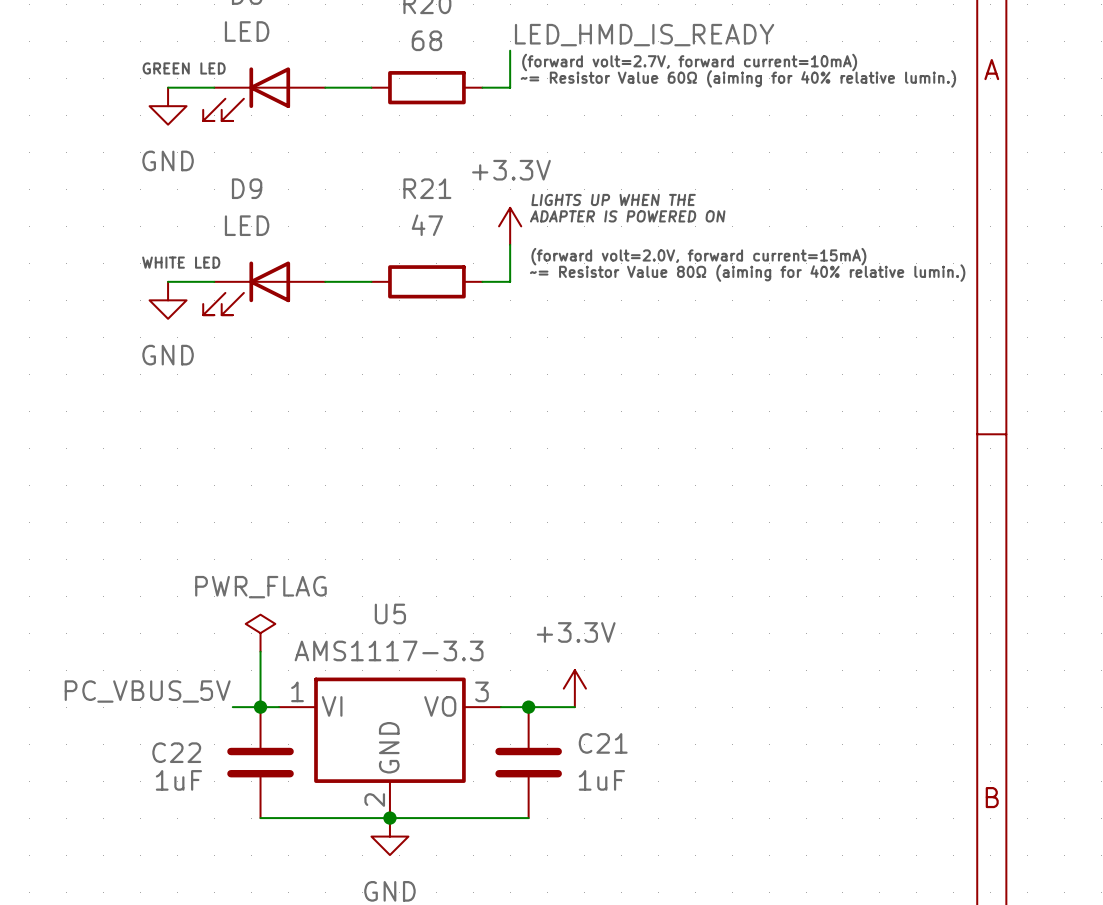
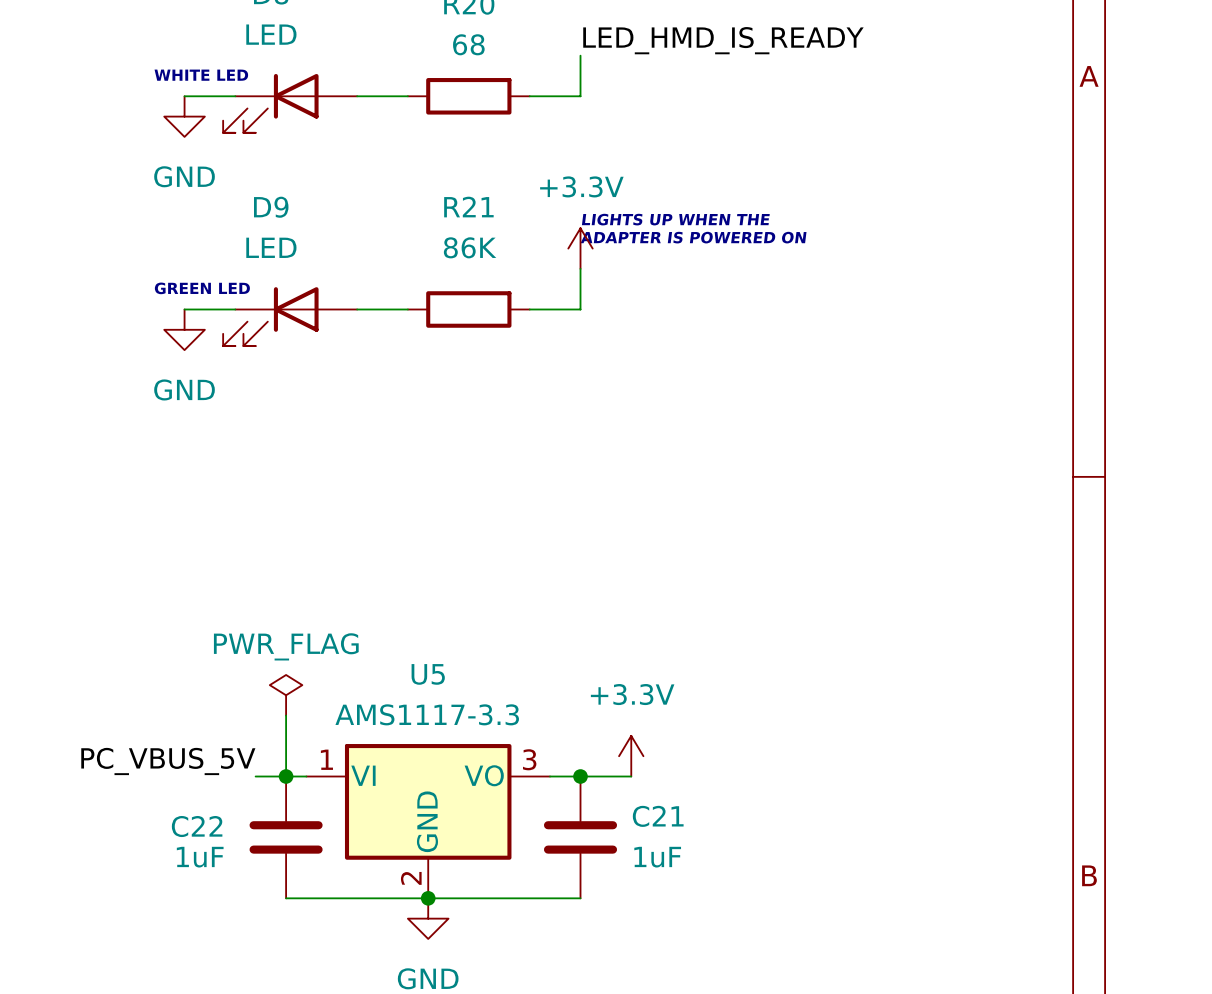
label position: LED_HMD_IS_READY (644, 35) -> LED_HMD_IS_READY (723, 40)
wire: (510, 50) (510, 87) -> (580, 55) (580, 96) (560, 96)
text: (forward volt=2.7V, forward current=10mA) (689, 62) -> none
text: GREEN LED (184, 68) -> WHITE LED (201, 75)
text: ~= Resistor Value 60Ω (aiming for 40% relative lumin.) (738, 78) -> none
R21 value: 47 (427, 225) -> 86K (470, 247)
power symbol position: +3.3V (510, 226) -> +3.3V (580, 248)
wire: (510, 244) (510, 281) -> (580, 268) (580, 309) (560, 309)
text: (forward volt=2.0V, forward current=15mA) (698, 256) -> none
text: WHITE LED (181, 262) -> GREEN LED (202, 288)
text: ~= Resistor Value 80Ω (aiming for 40% relative lumin.) (747, 273) -> none

